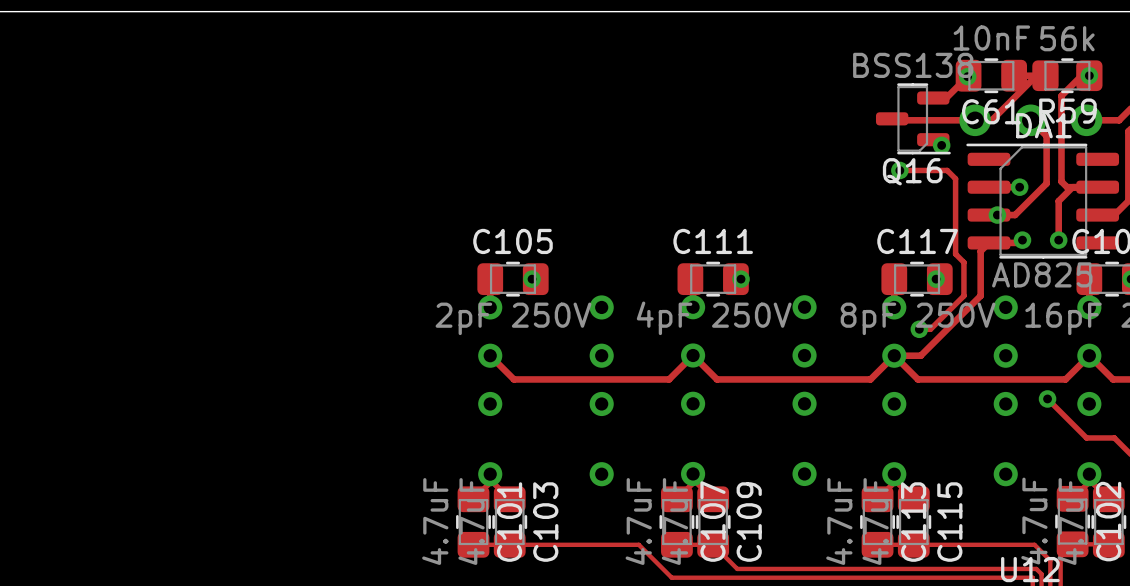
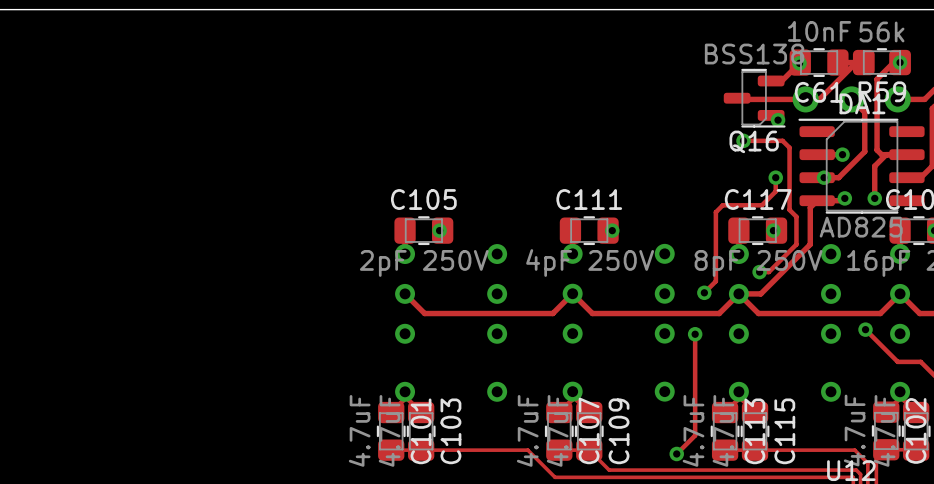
track: none -> (775, 177) (775, 191) (761, 205) (722, 205) (715, 212) (715, 281) (704, 292)
via: none -> (775, 177)
via: none -> (704, 292)
track: none -> (695, 334) (695, 435) (676, 453)
via: none -> (695, 334)
via: none -> (676, 453)

